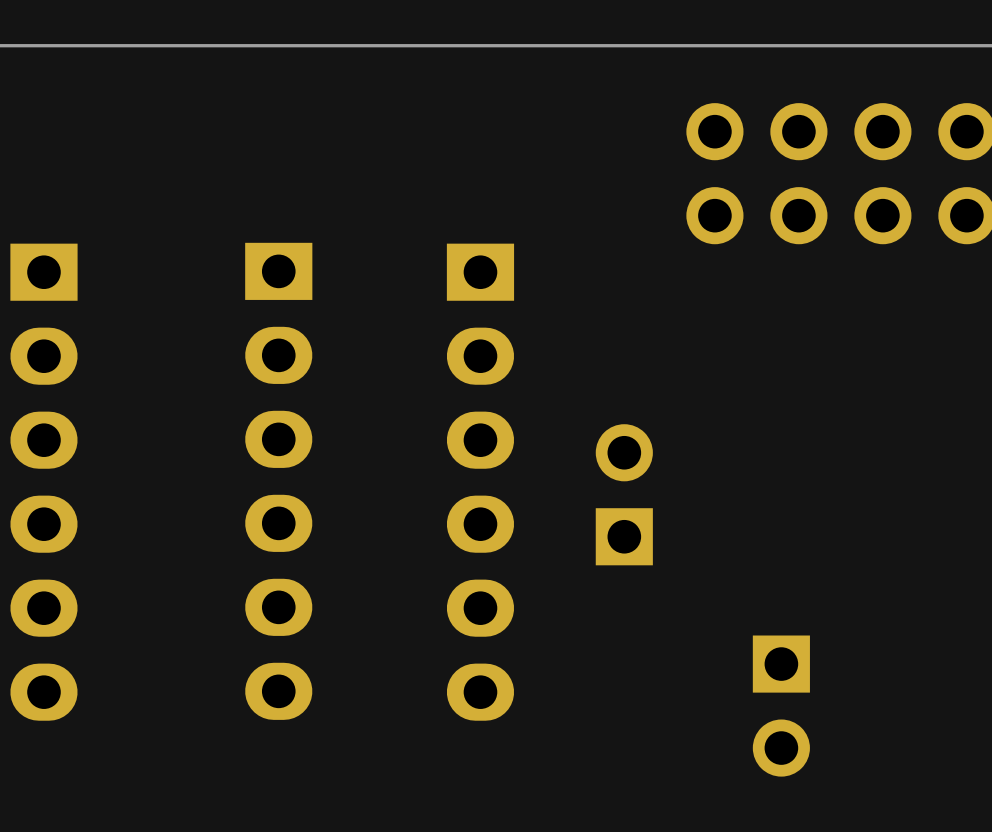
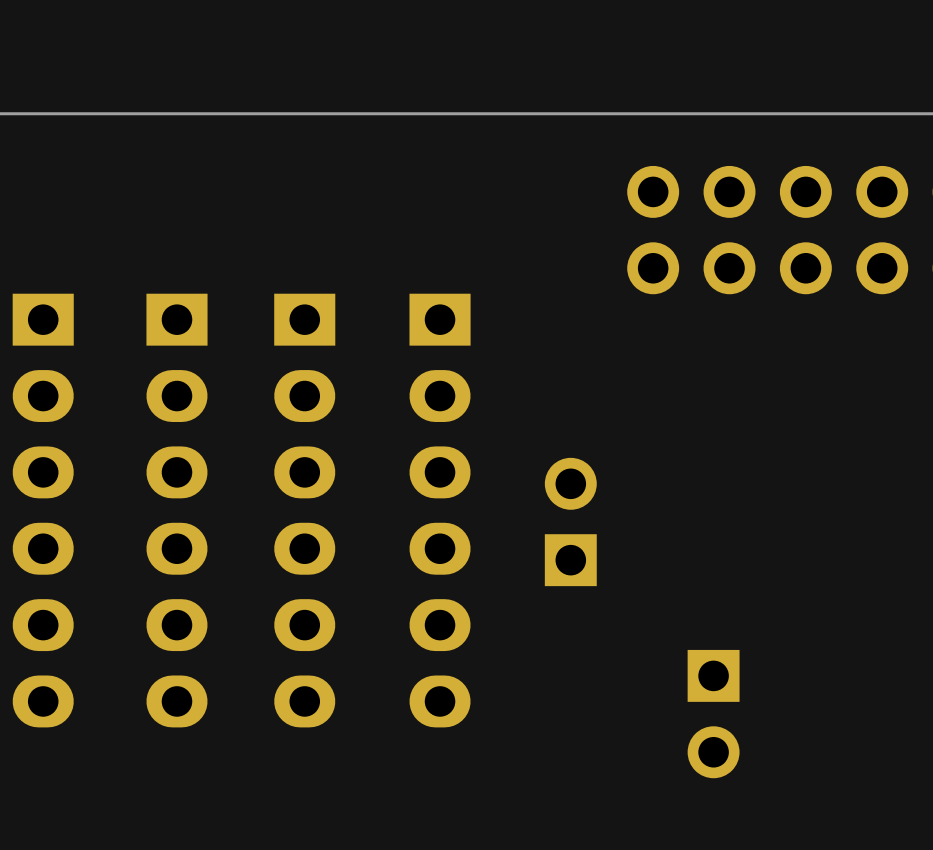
part: (278, 481) -> none
part: none -> (176, 510)
part: none -> (304, 510)

